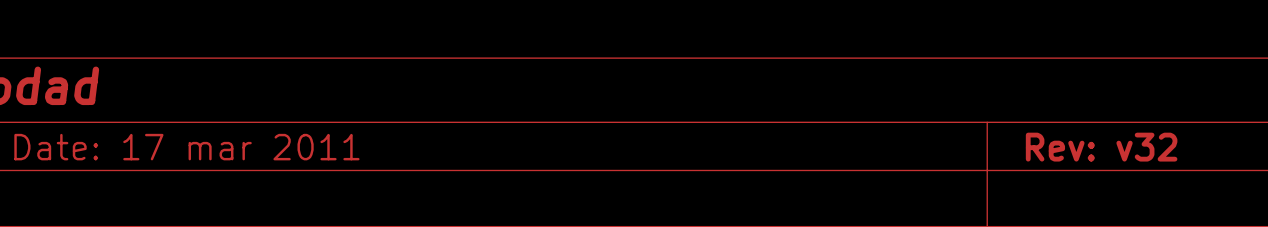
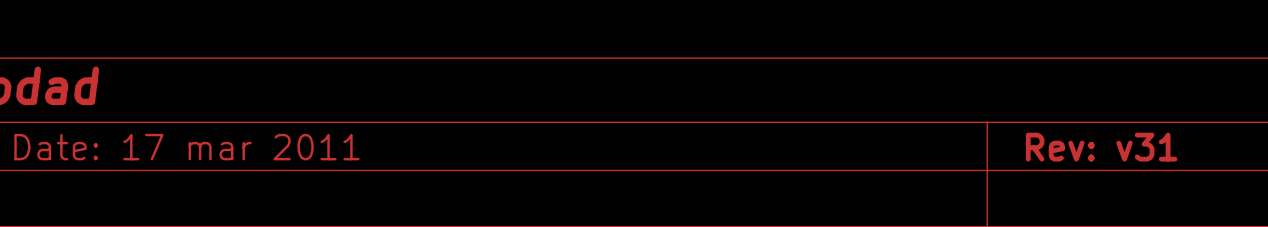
title block: Rev: v32 (1101, 147) -> Rev: v31 (1101, 147)

